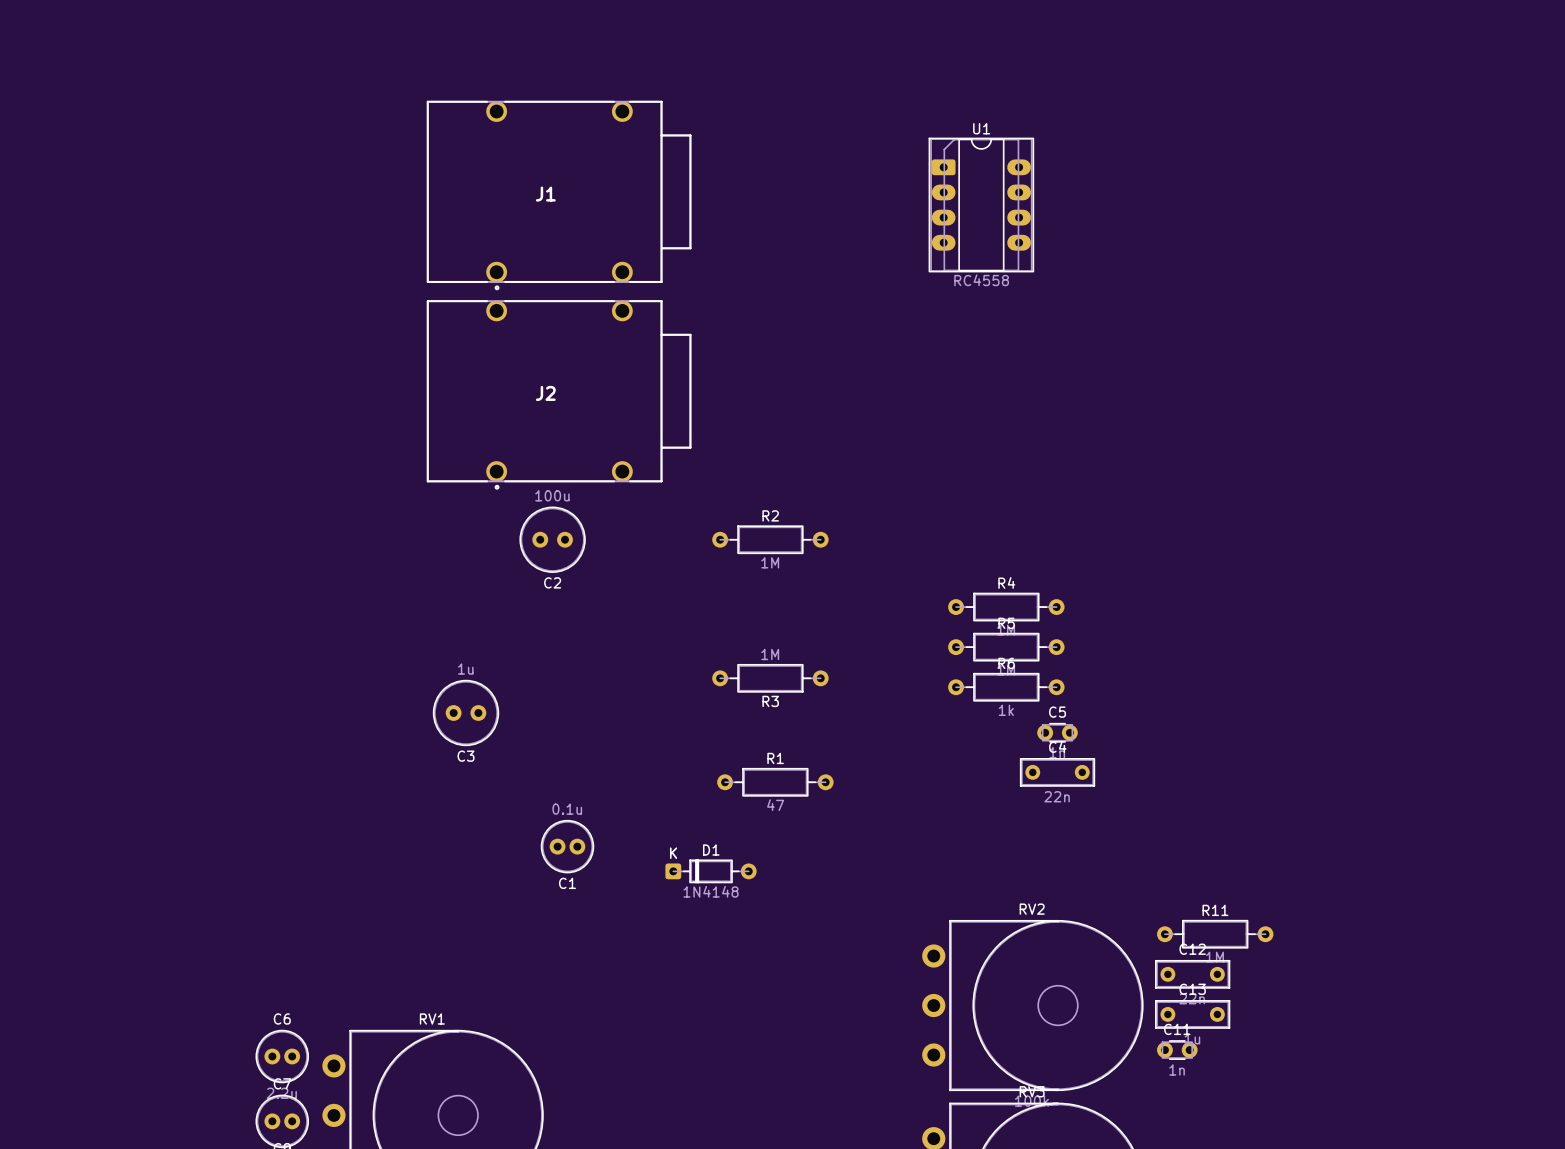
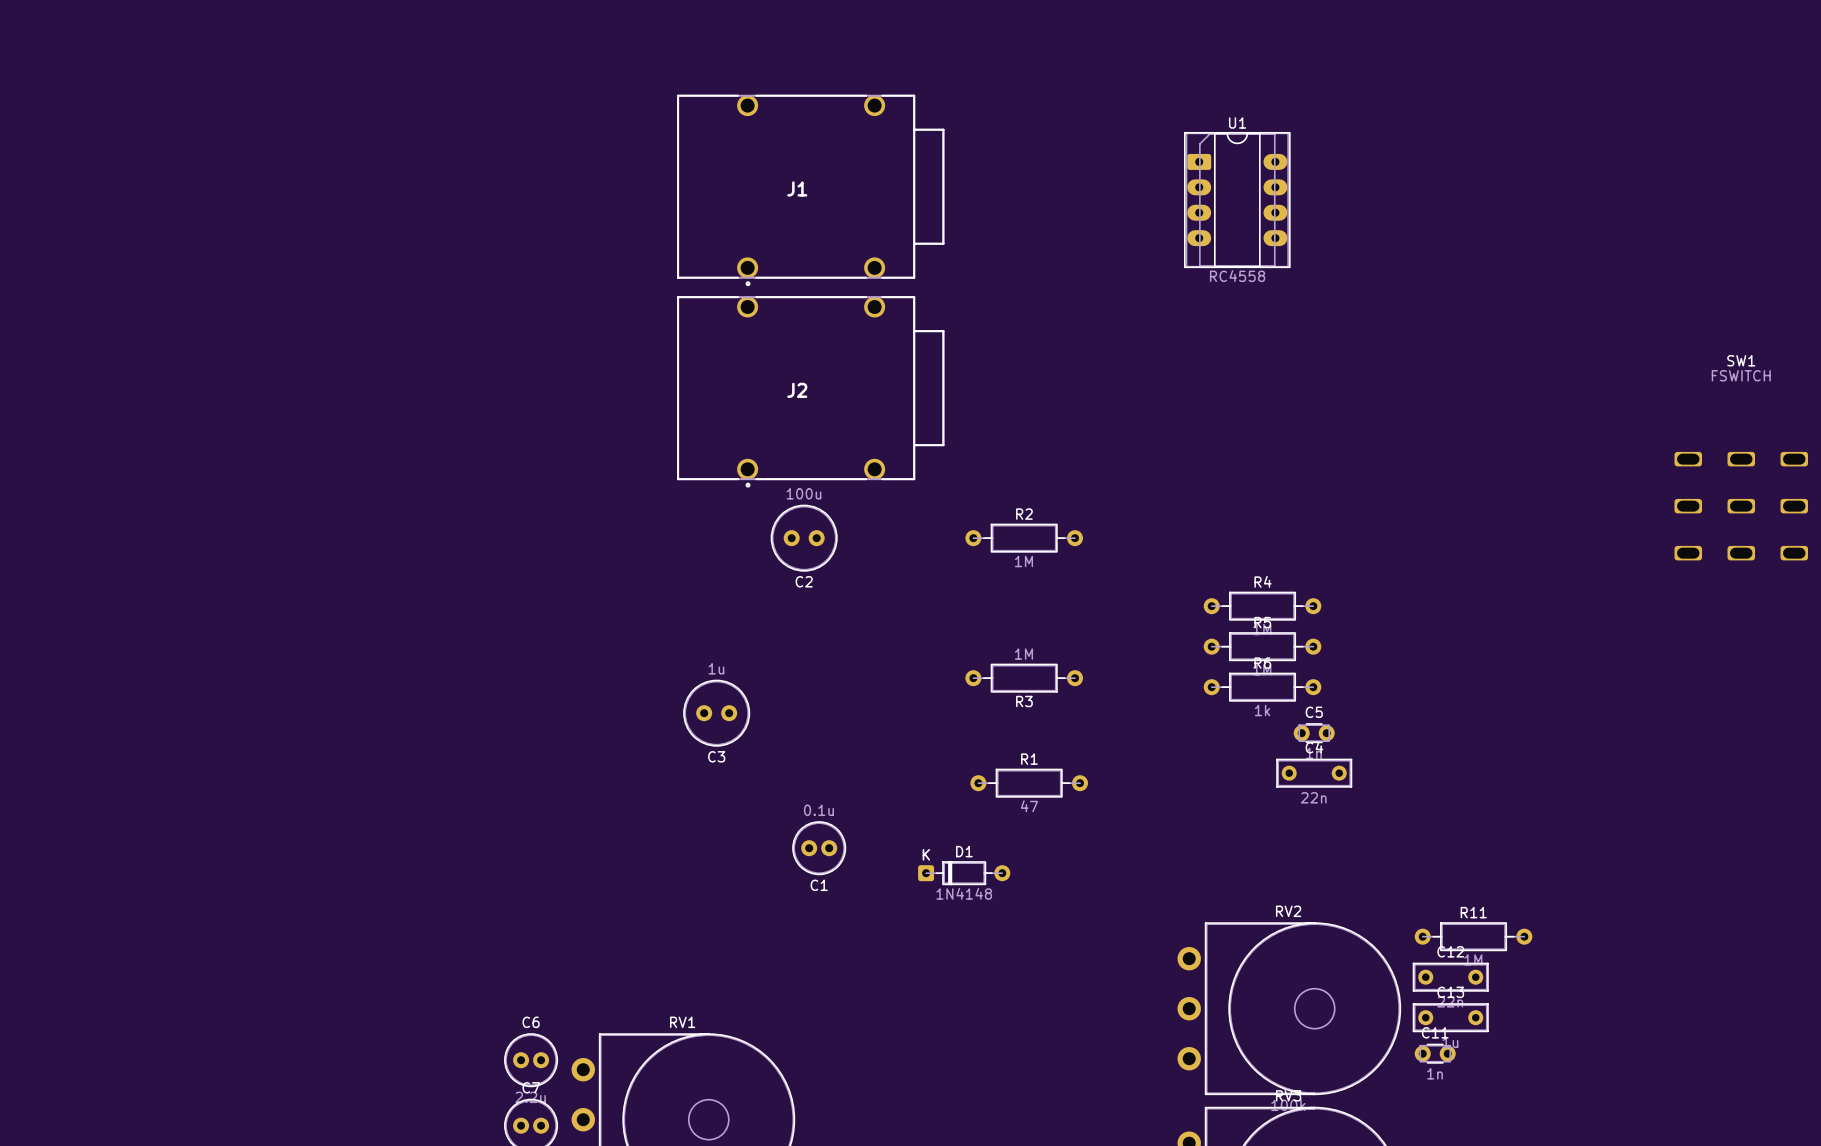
SW1: none -> FSWITCH (1741, 506)

